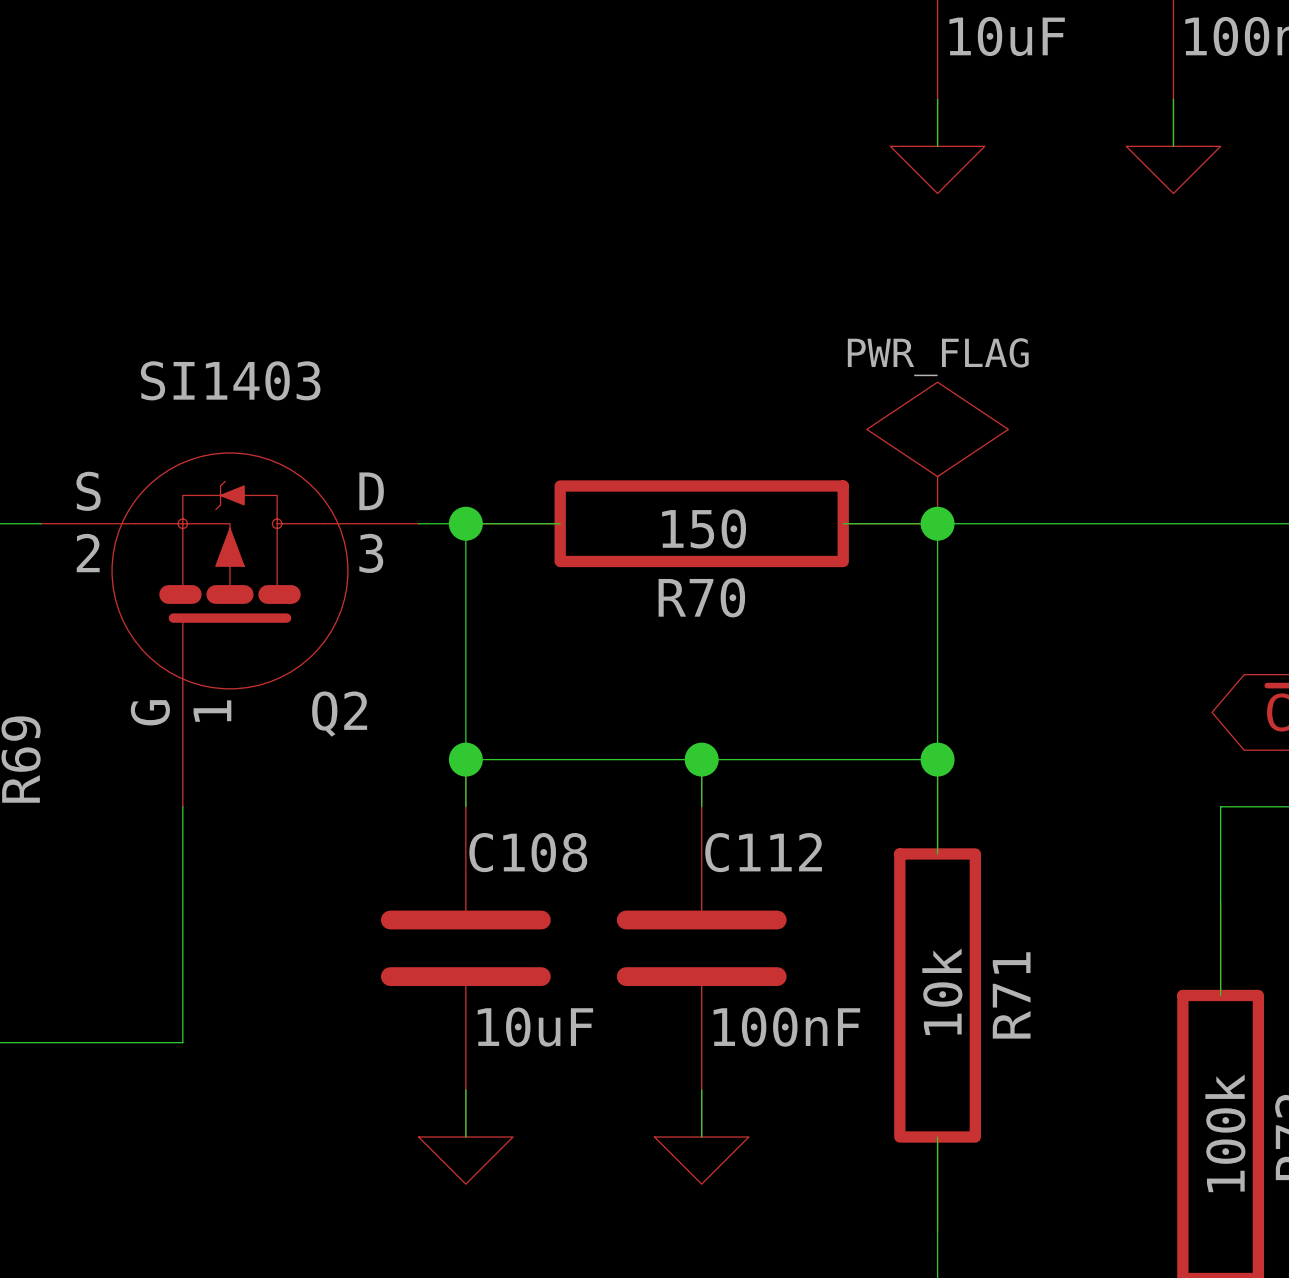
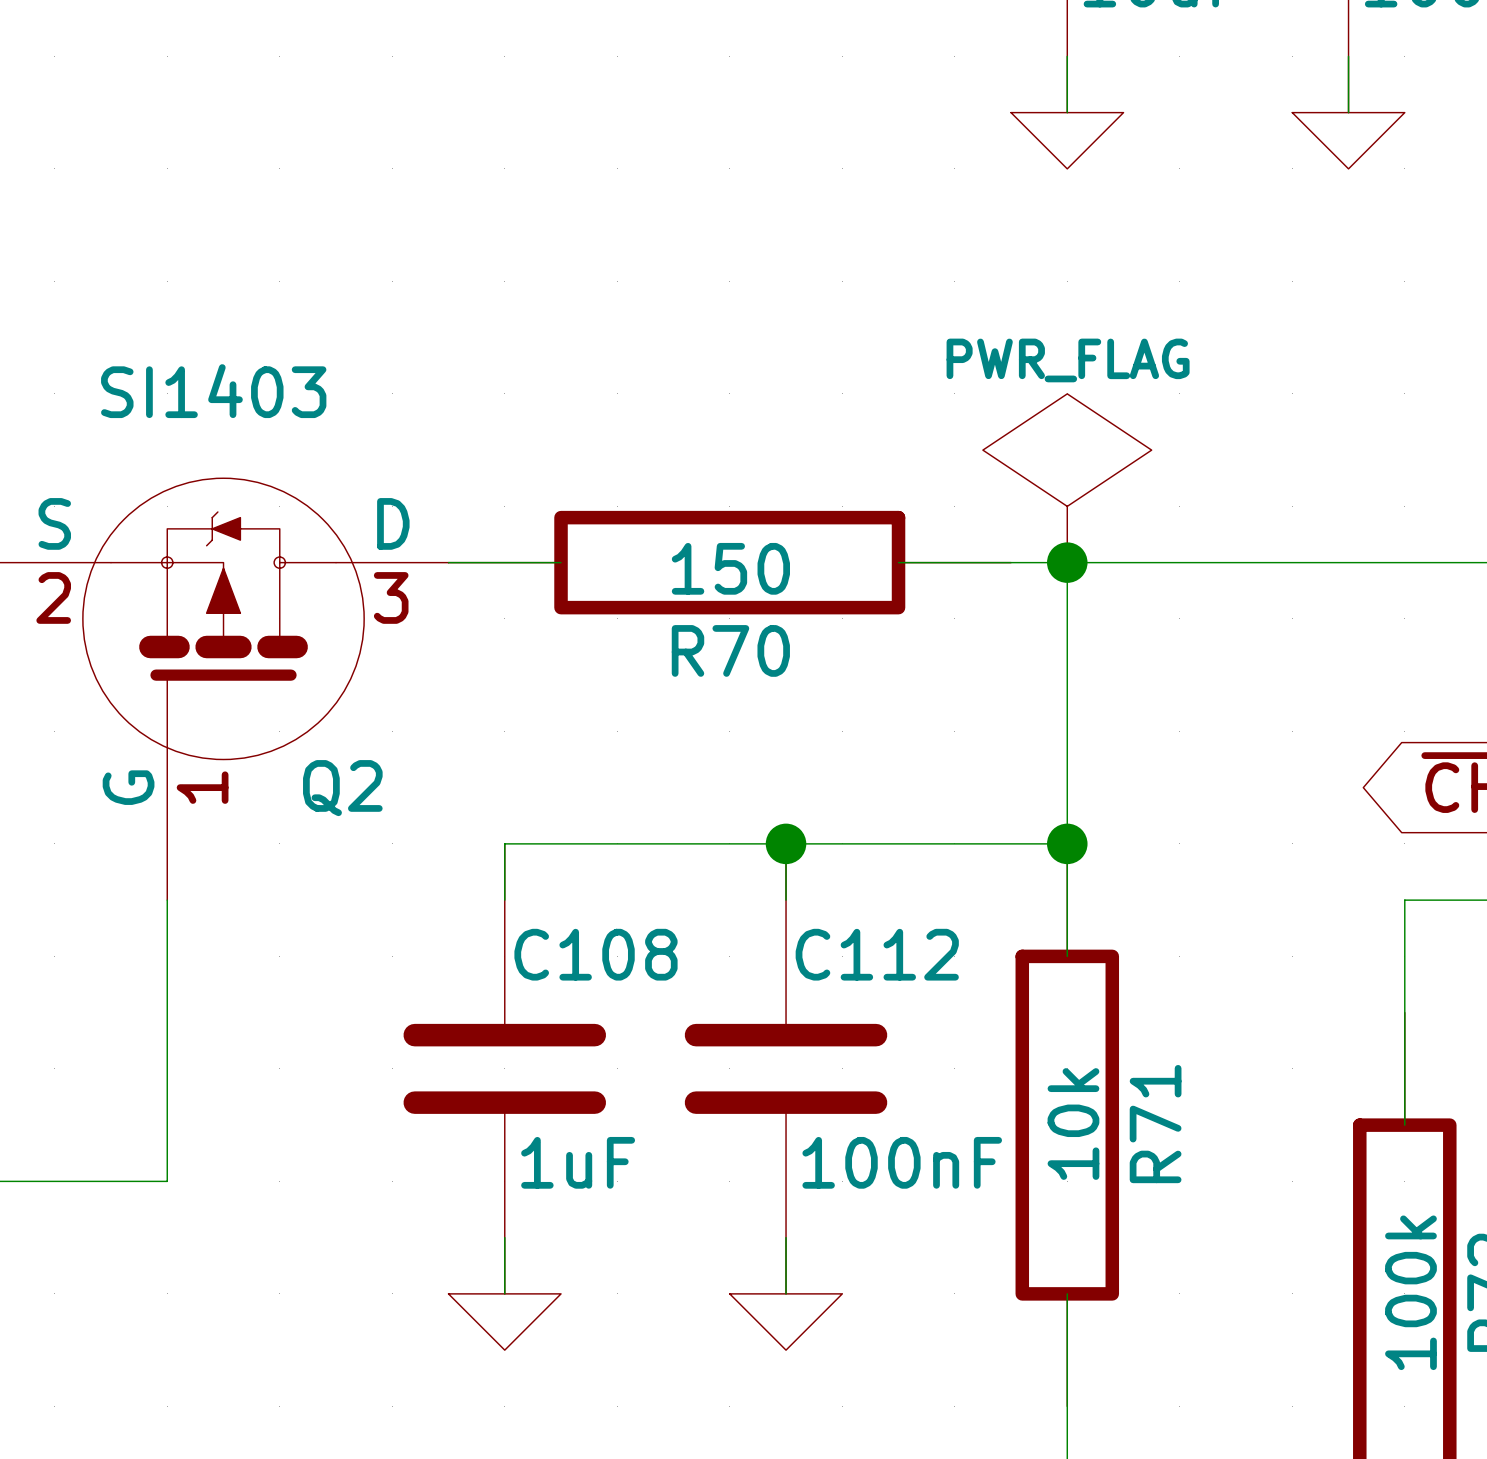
wire: (465, 523) (465, 759) -> none
junction: (465, 523) -> none
wire: (513, 523) (560, 523) -> (898, 562) (954, 562)
R70 position: (701, 523) -> (729, 562)
junction: (465, 759) -> none
C108 value: 10uF (535, 1027) -> 1uF (578, 1162)

